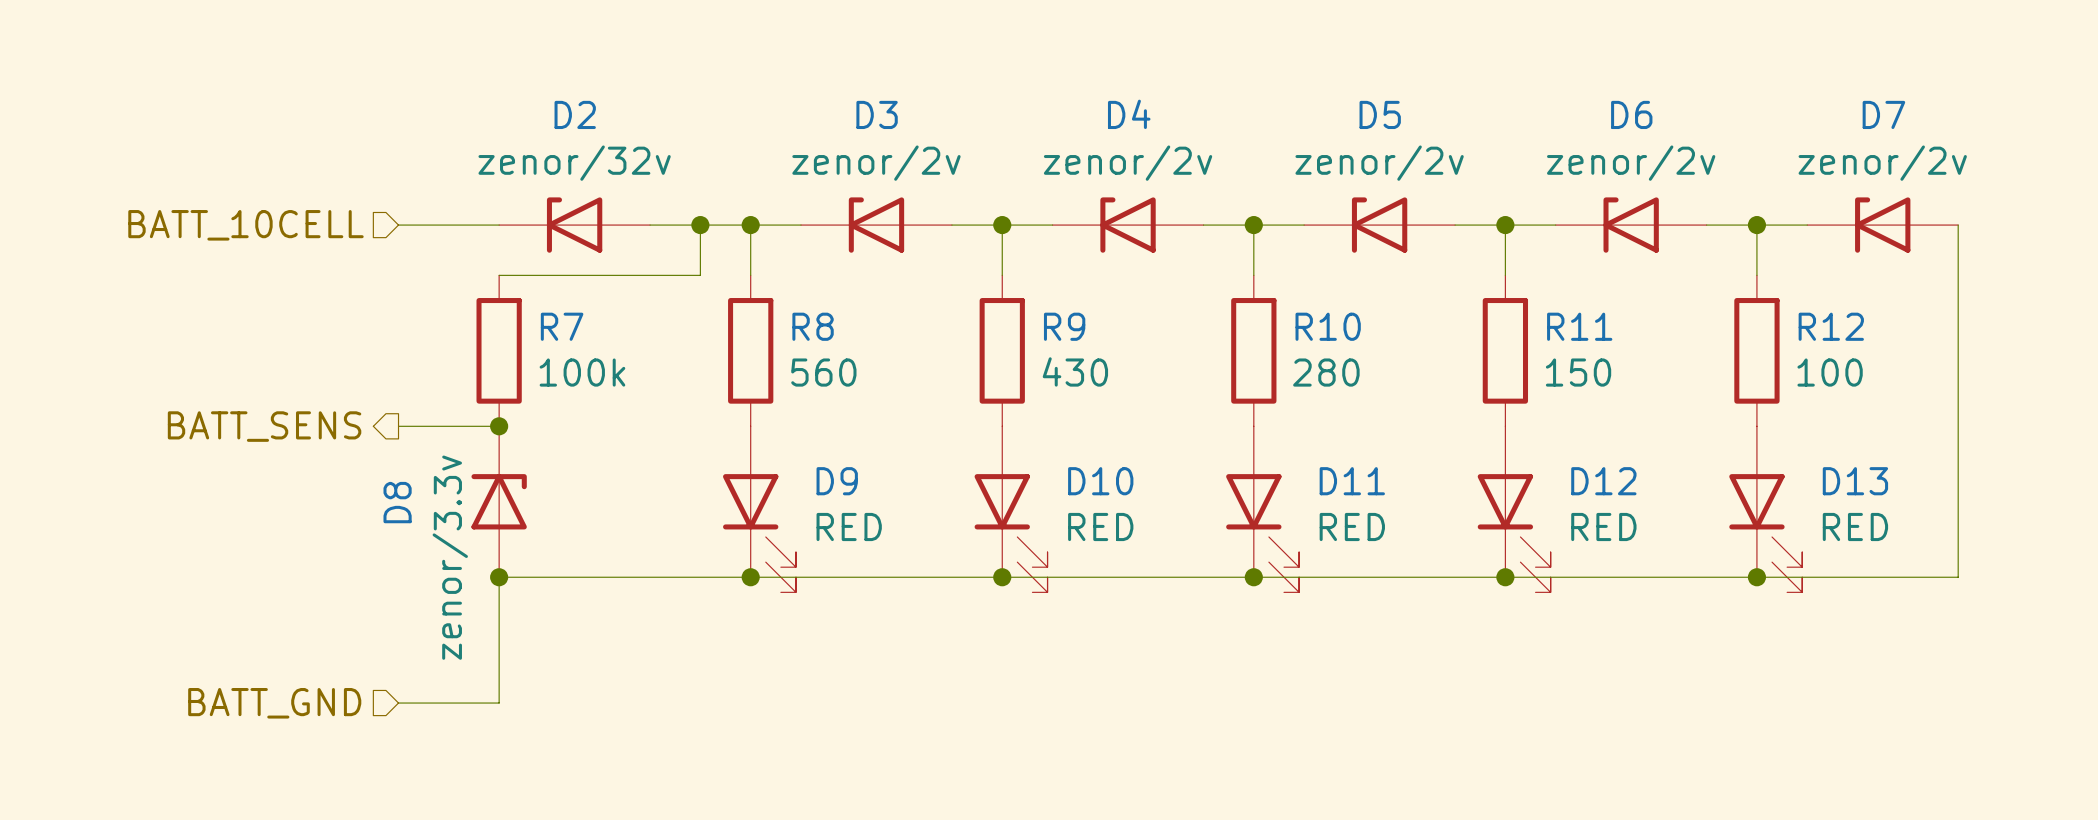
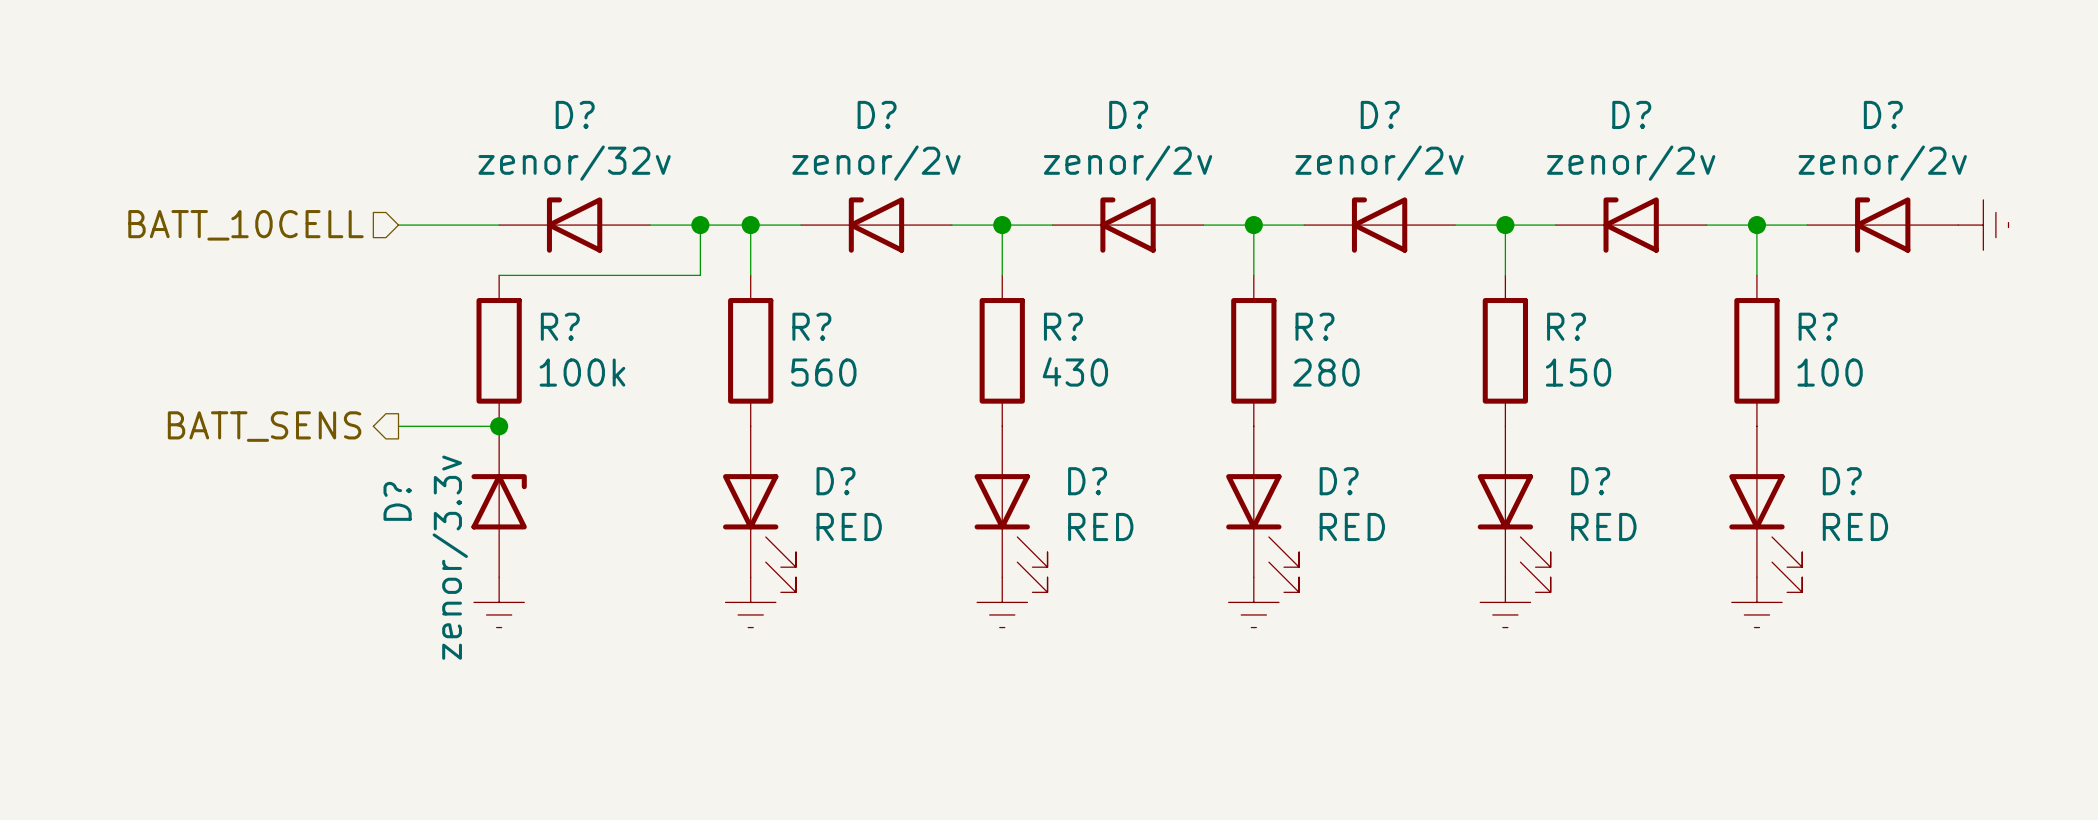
D2 name: D2 (575, 114) -> D? (575, 114)
D3 name: D3 (877, 114) -> D? (877, 114)
D4 name: D4 (1129, 114) -> D? (1128, 114)
D5 name: D5 (1380, 114) -> D? (1380, 114)
D6 name: D6 (1631, 114) -> D? (1631, 114)
D7 name: D7 (1883, 114) -> D? (1883, 114)
wire: (1958, 225) (1958, 577) (499, 577) (499, 703) (398, 703) -> none
power symbol: none -> (1983, 225)
R7 name: R7 (562, 326) -> R? (560, 326)
R8 name: R8 (813, 326) -> R? (811, 326)
R9 name: R9 (1064, 326) -> R? (1063, 326)
R10 name: R10 (1328, 326) -> R? (1314, 326)
R11 name: R11 (1579, 326) -> R? (1566, 326)
R12 name: R12 (1831, 326) -> R? (1818, 326)
D9 name: D9 (837, 481) -> D? (836, 481)
D10 name: D10 (1100, 481) -> D? (1087, 481)
D11 name: D11 (1352, 481) -> D? (1339, 481)
D12 name: D12 (1603, 481) -> D? (1590, 481)
D13 name: D13 (1855, 481) -> D? (1842, 481)
D8 name: D8 (397, 502) -> D? (397, 501)
junction: (499, 577) -> none
junction: (750, 577) -> none
junction: (1002, 577) -> none
junction: (1253, 577) -> none
junction: (1505, 577) -> none
junction: (1756, 577) -> none
power symbol: none -> (499, 602)
power symbol: none -> (750, 602)
power symbol: none -> (1002, 602)
power symbol: none -> (1253, 602)
power symbol: none -> (1505, 602)
power symbol: none -> (1756, 602)
hierarchical label: BATT_GND (274, 703) -> none

